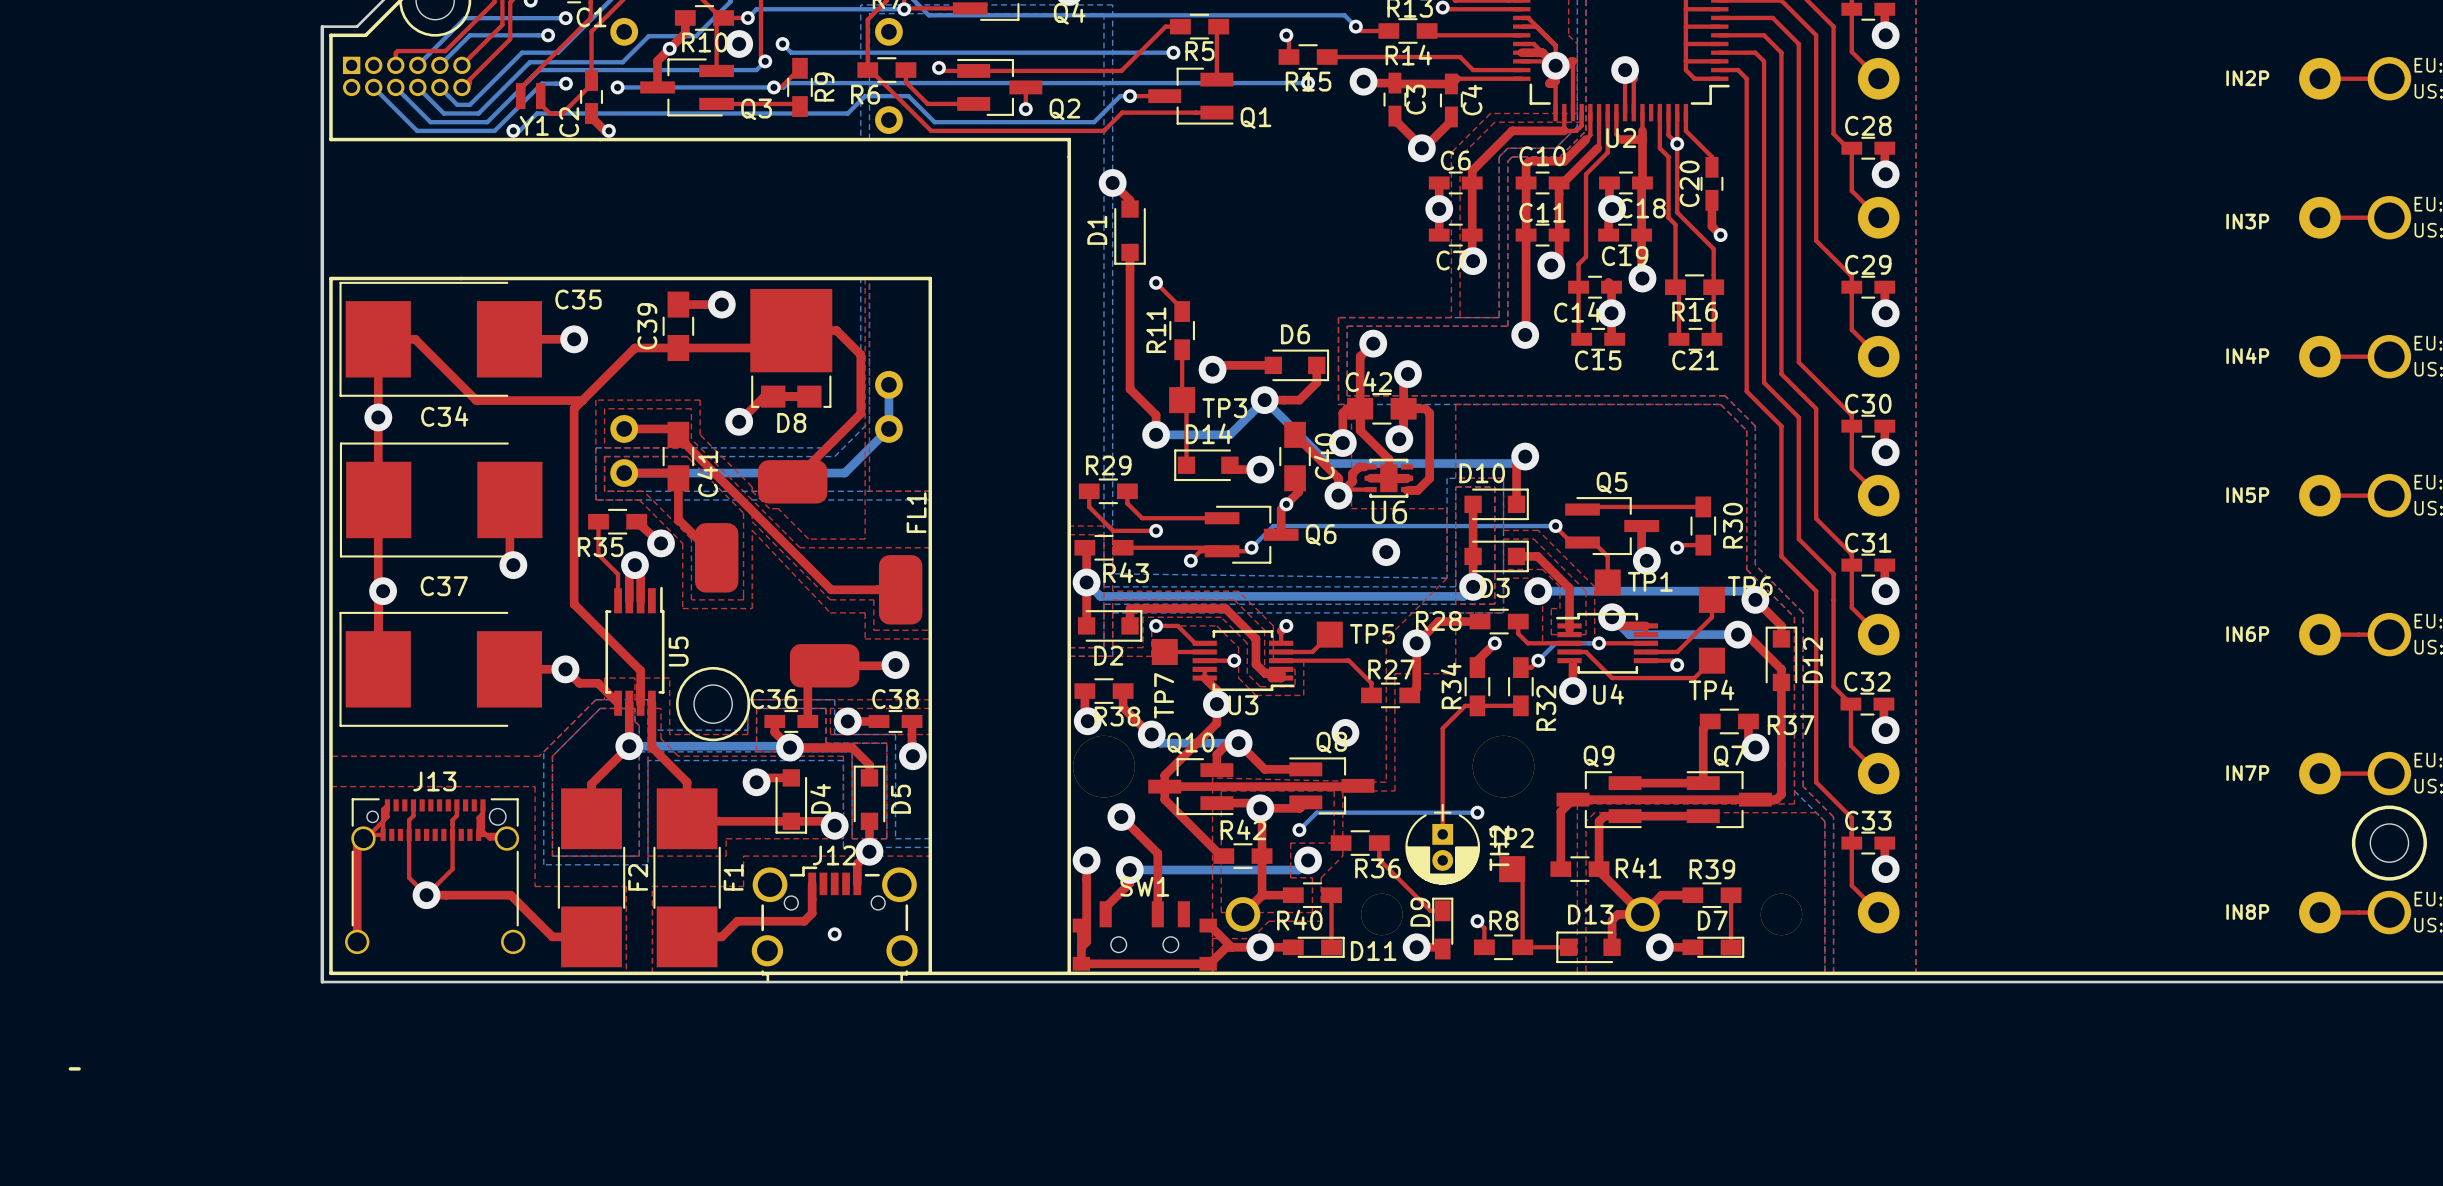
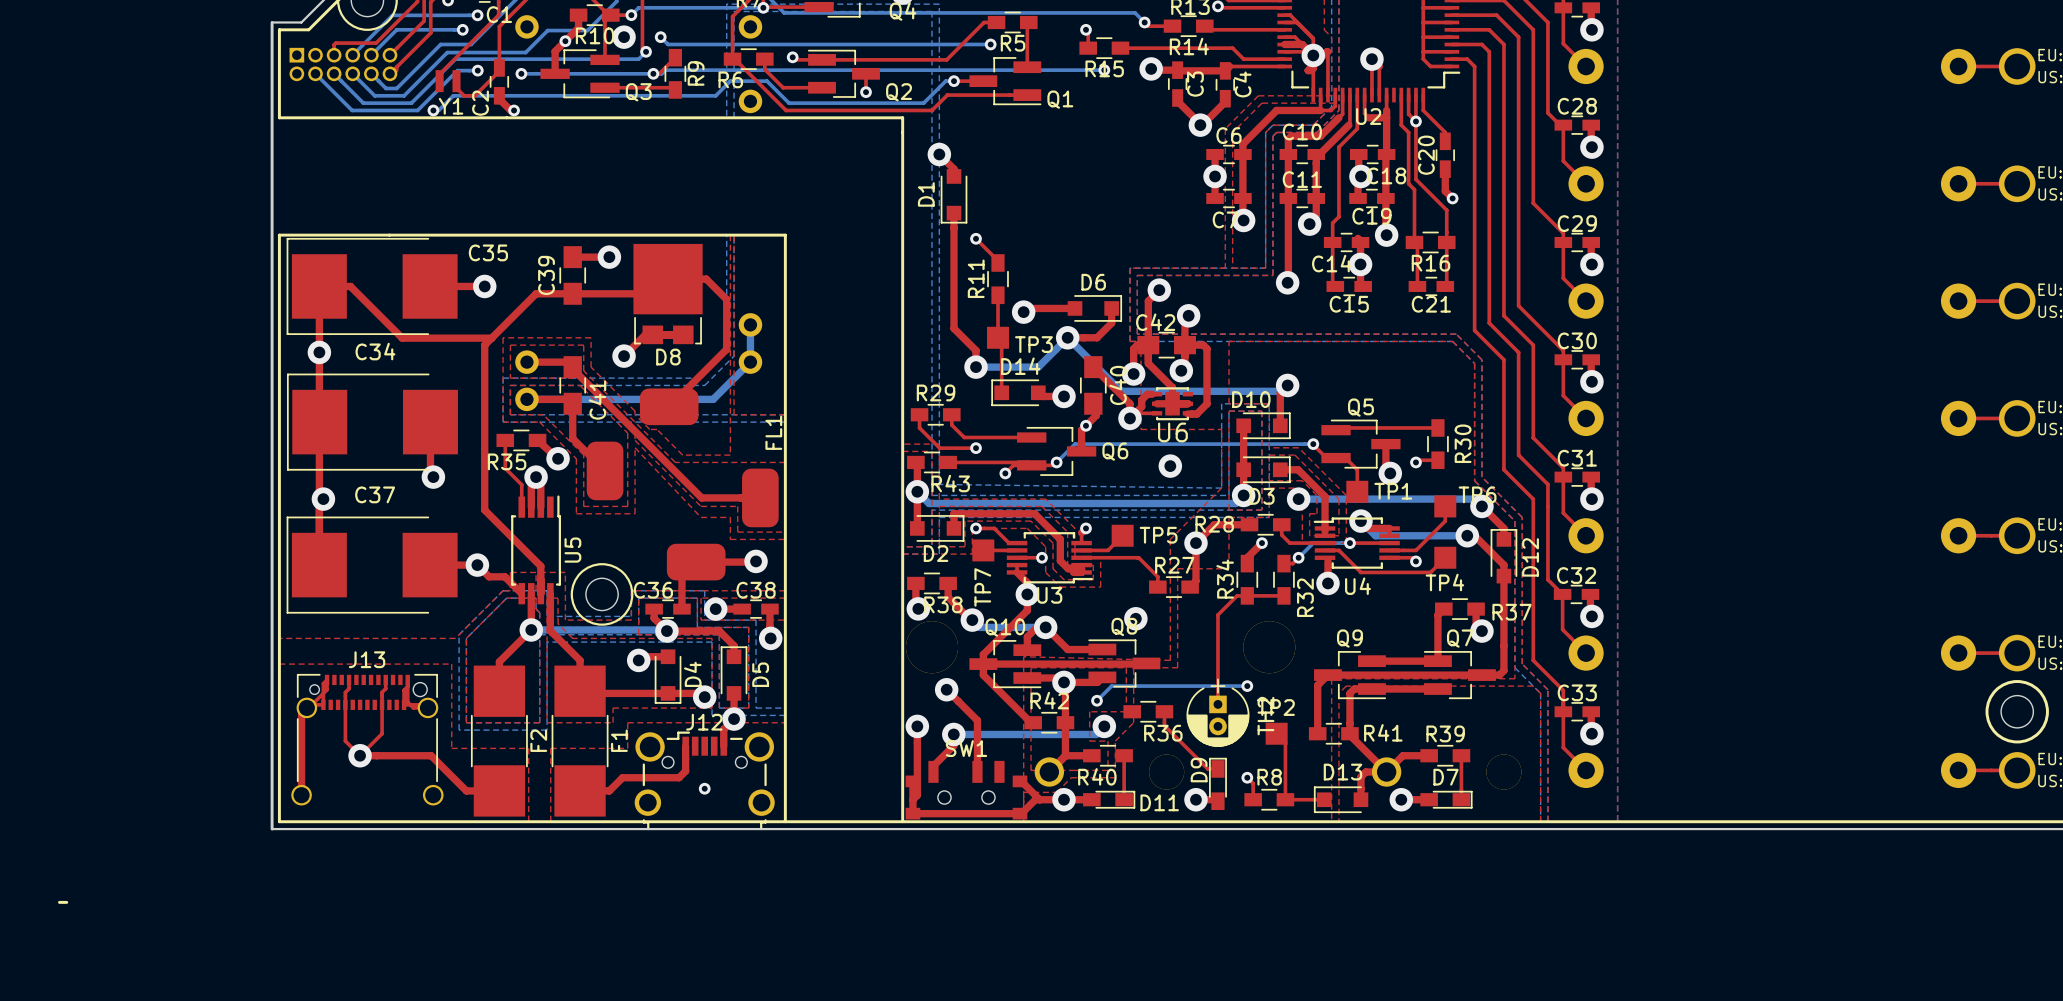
text: IN2P (2247, 78) -> none
text: IN3P (2247, 221) -> none
text: IN4P (2247, 355) -> none
text: IN5P (2247, 495) -> none
text: IN6P (2247, 634) -> none
text: IN7P (2247, 773) -> none
text: IN8P (2247, 912) -> none

